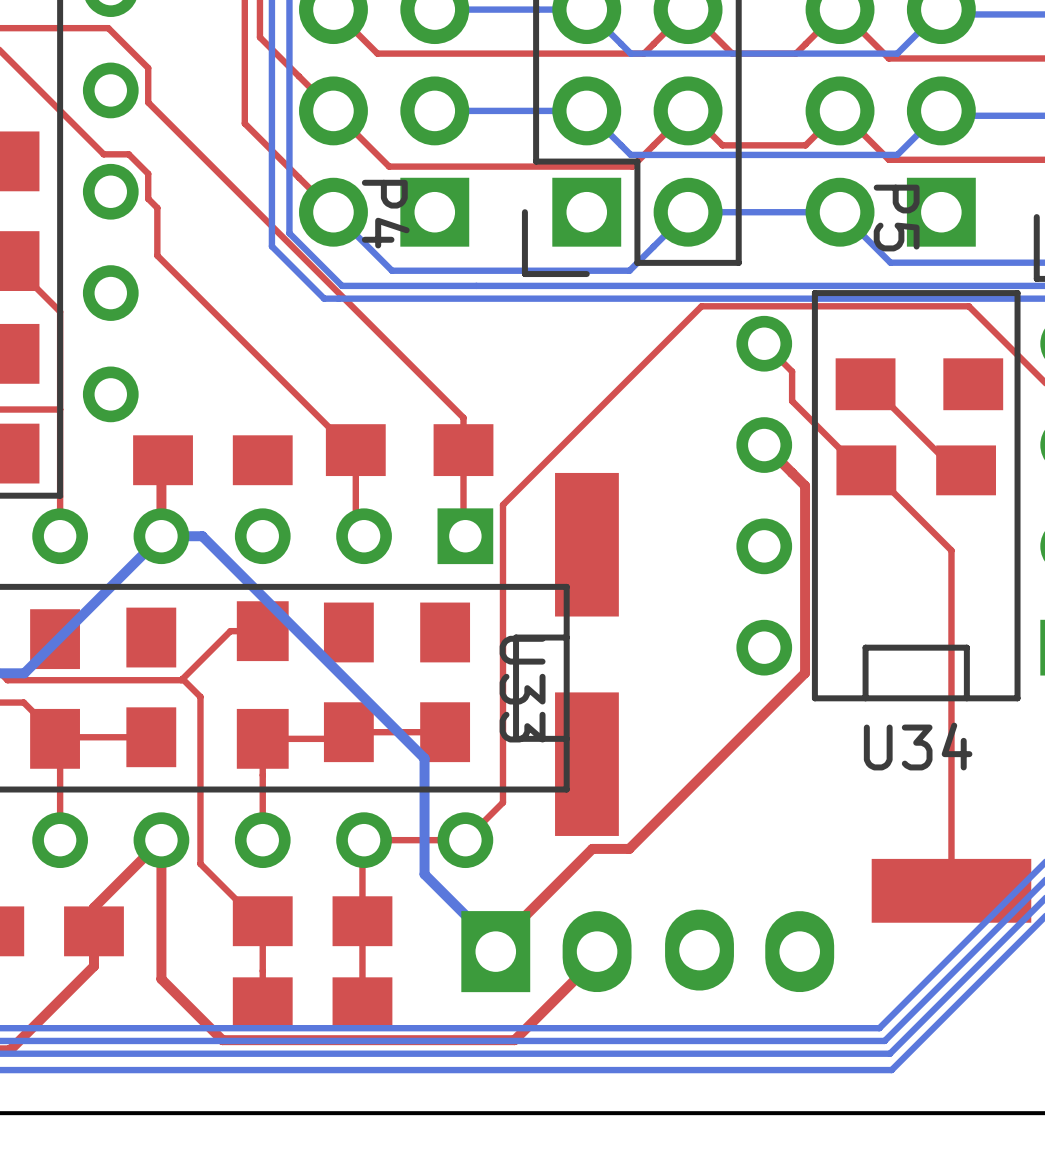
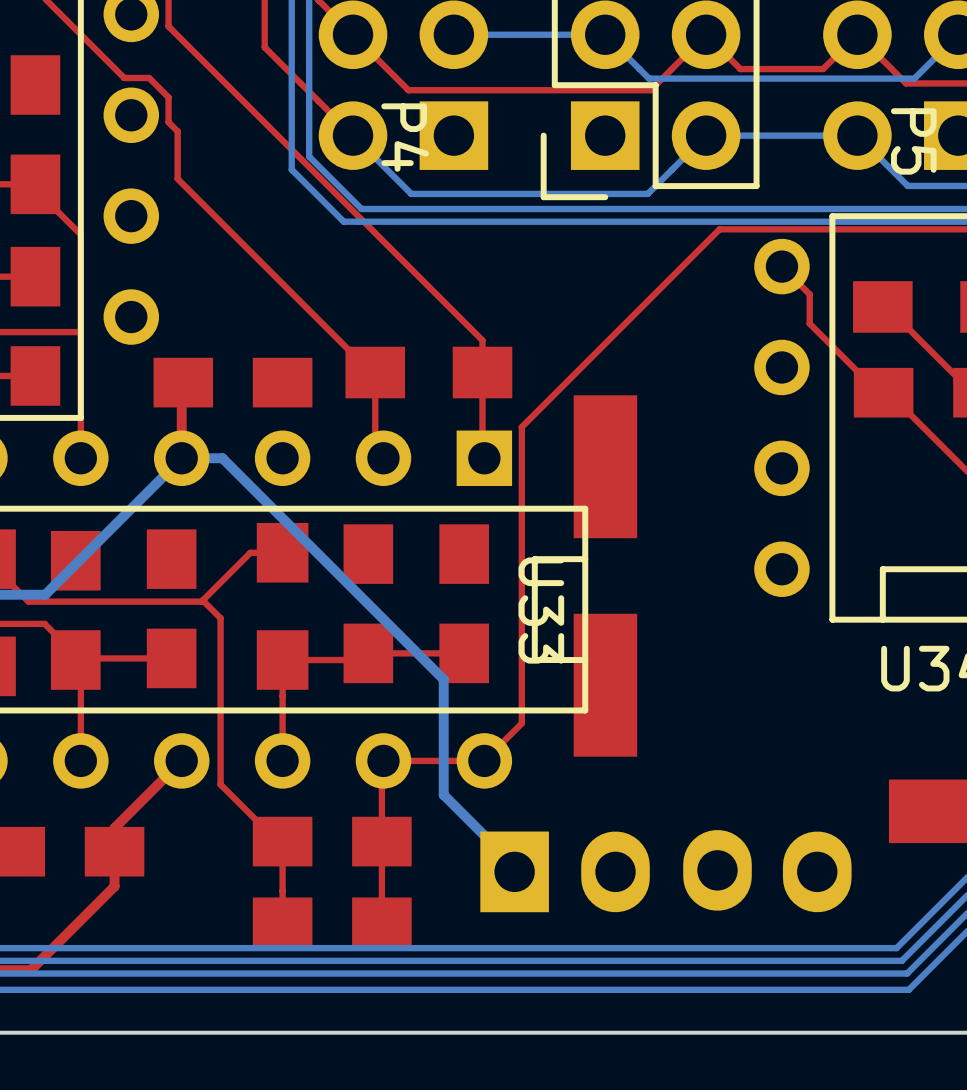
top track: (764, 445) (805, 485) (805, 673) (629, 848) (592, 848) (495, 945) (495, 951) -> none
top track: (161, 840) (161, 979) (222, 1040) (514, 1040) (597, 957) (597, 951) -> none

